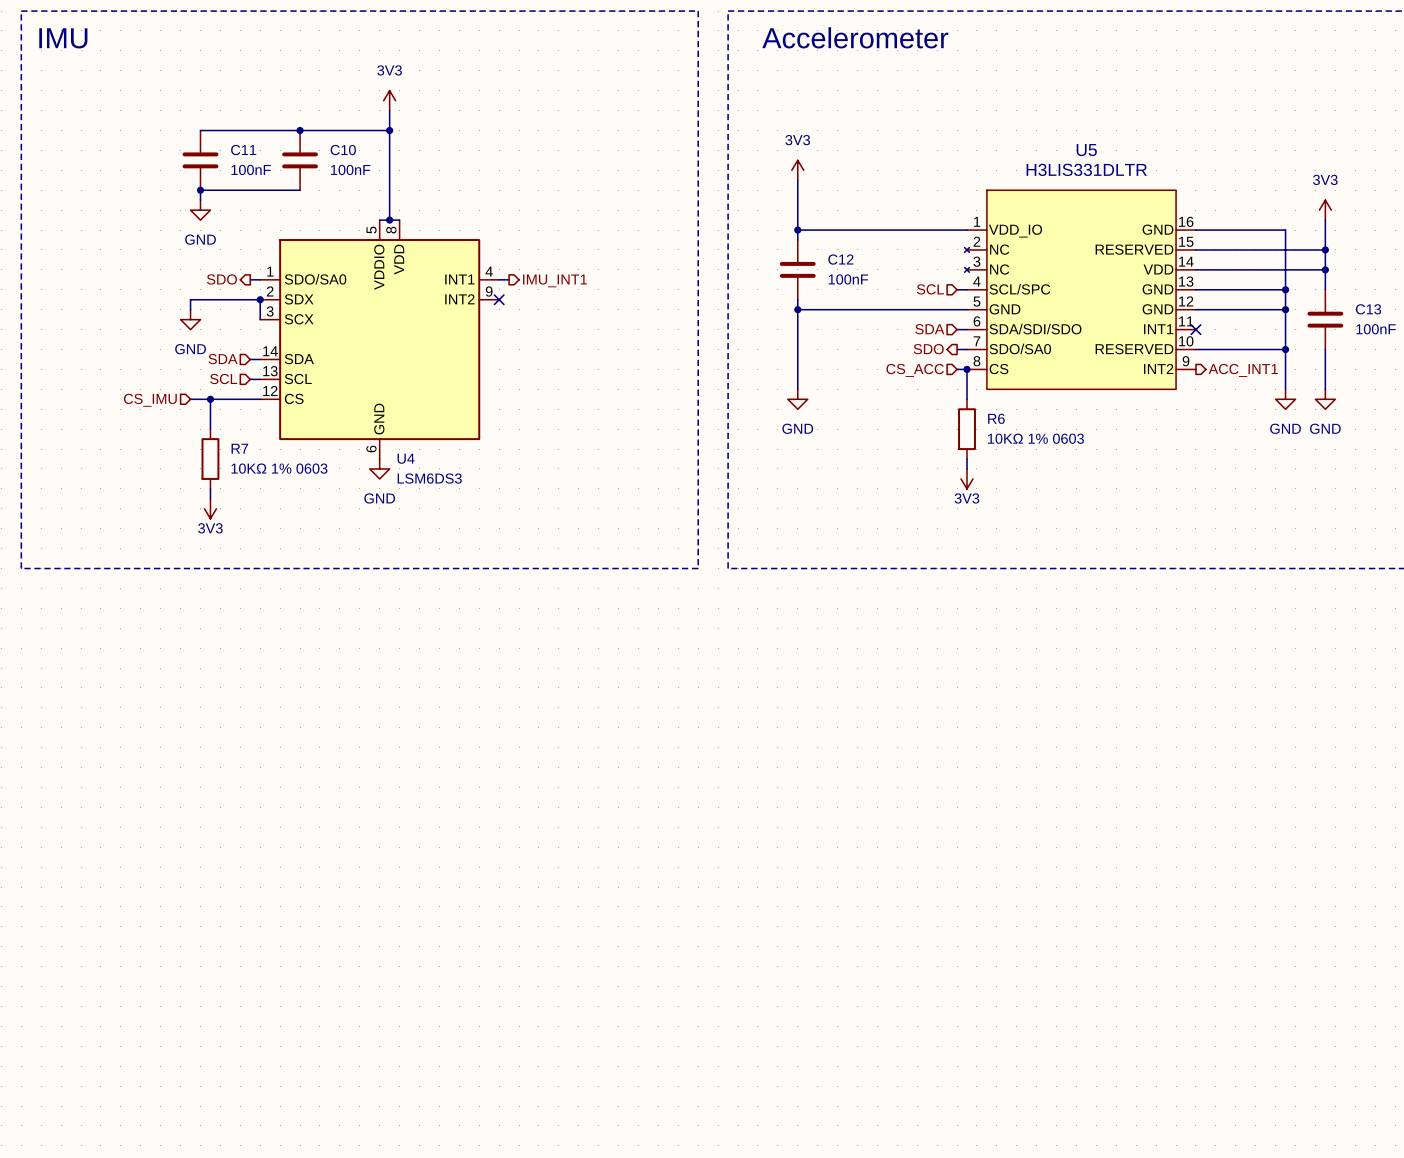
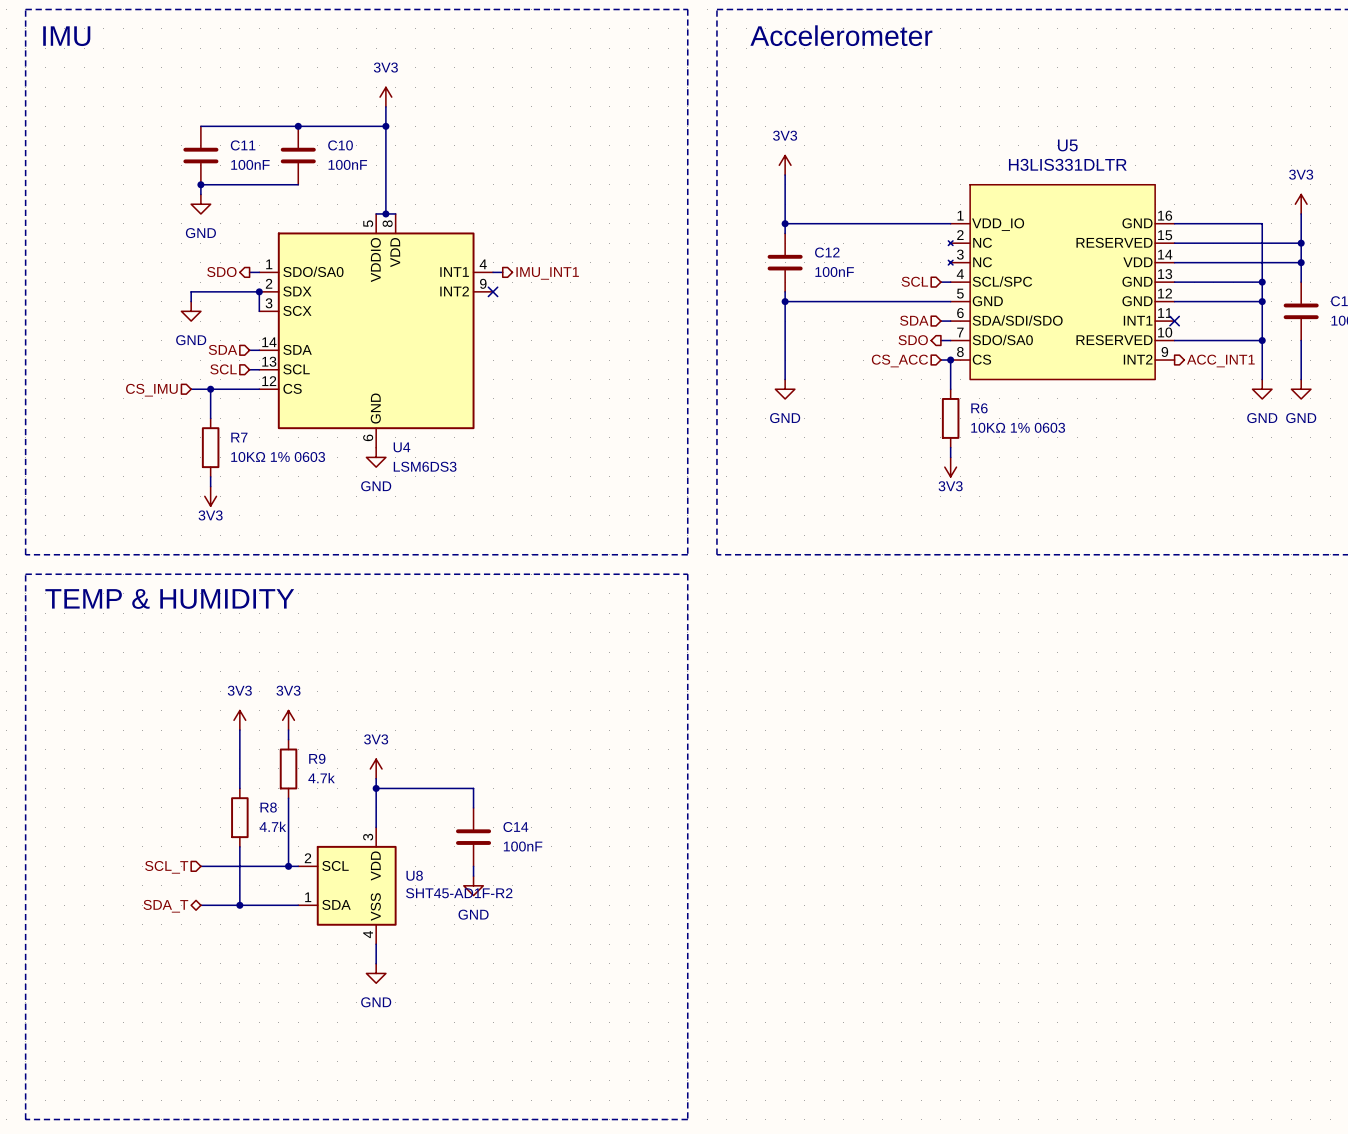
line: none -> (25, 574) (687, 574) (687, 1119) (25, 1119) (25, 574)
text: none -> TEMP & HUMIDITY (169, 598)
power symbol: none -> 3V3 (239, 720)
power symbol: none -> 3V3 (288, 720)
wire: none -> (239, 730) (239, 788)
wire: none -> (288, 730) (288, 739)
R9: none -> 4.7k (288, 768)
power symbol: none -> 3V3 (376, 768)
wire: none -> (376, 778) (376, 827)
wire: none -> (376, 788) (473, 788) (473, 807)
junction: none -> (376, 788)
wire: none -> (288, 798) (288, 866)
R8: none -> 4.7k (239, 817)
C14: none -> 100nF (473, 837)
wire: none -> (239, 846) (239, 905)
wire: none -> (200, 866) (298, 866)
junction: none -> (288, 866)
wire: none -> (473, 866) (473, 876)
hierarchical label: none -> SCL_T (166, 867)
U8: none -> SHT45-AD1F-R2 (347, 885)
power symbol: none -> GND (473, 885)
wire: none -> (200, 905) (298, 905)
junction: none -> (239, 905)
hierarchical label: none -> SDA_T (165, 906)
wire: none -> (376, 944) (376, 963)
power symbol: none -> GND (376, 973)

